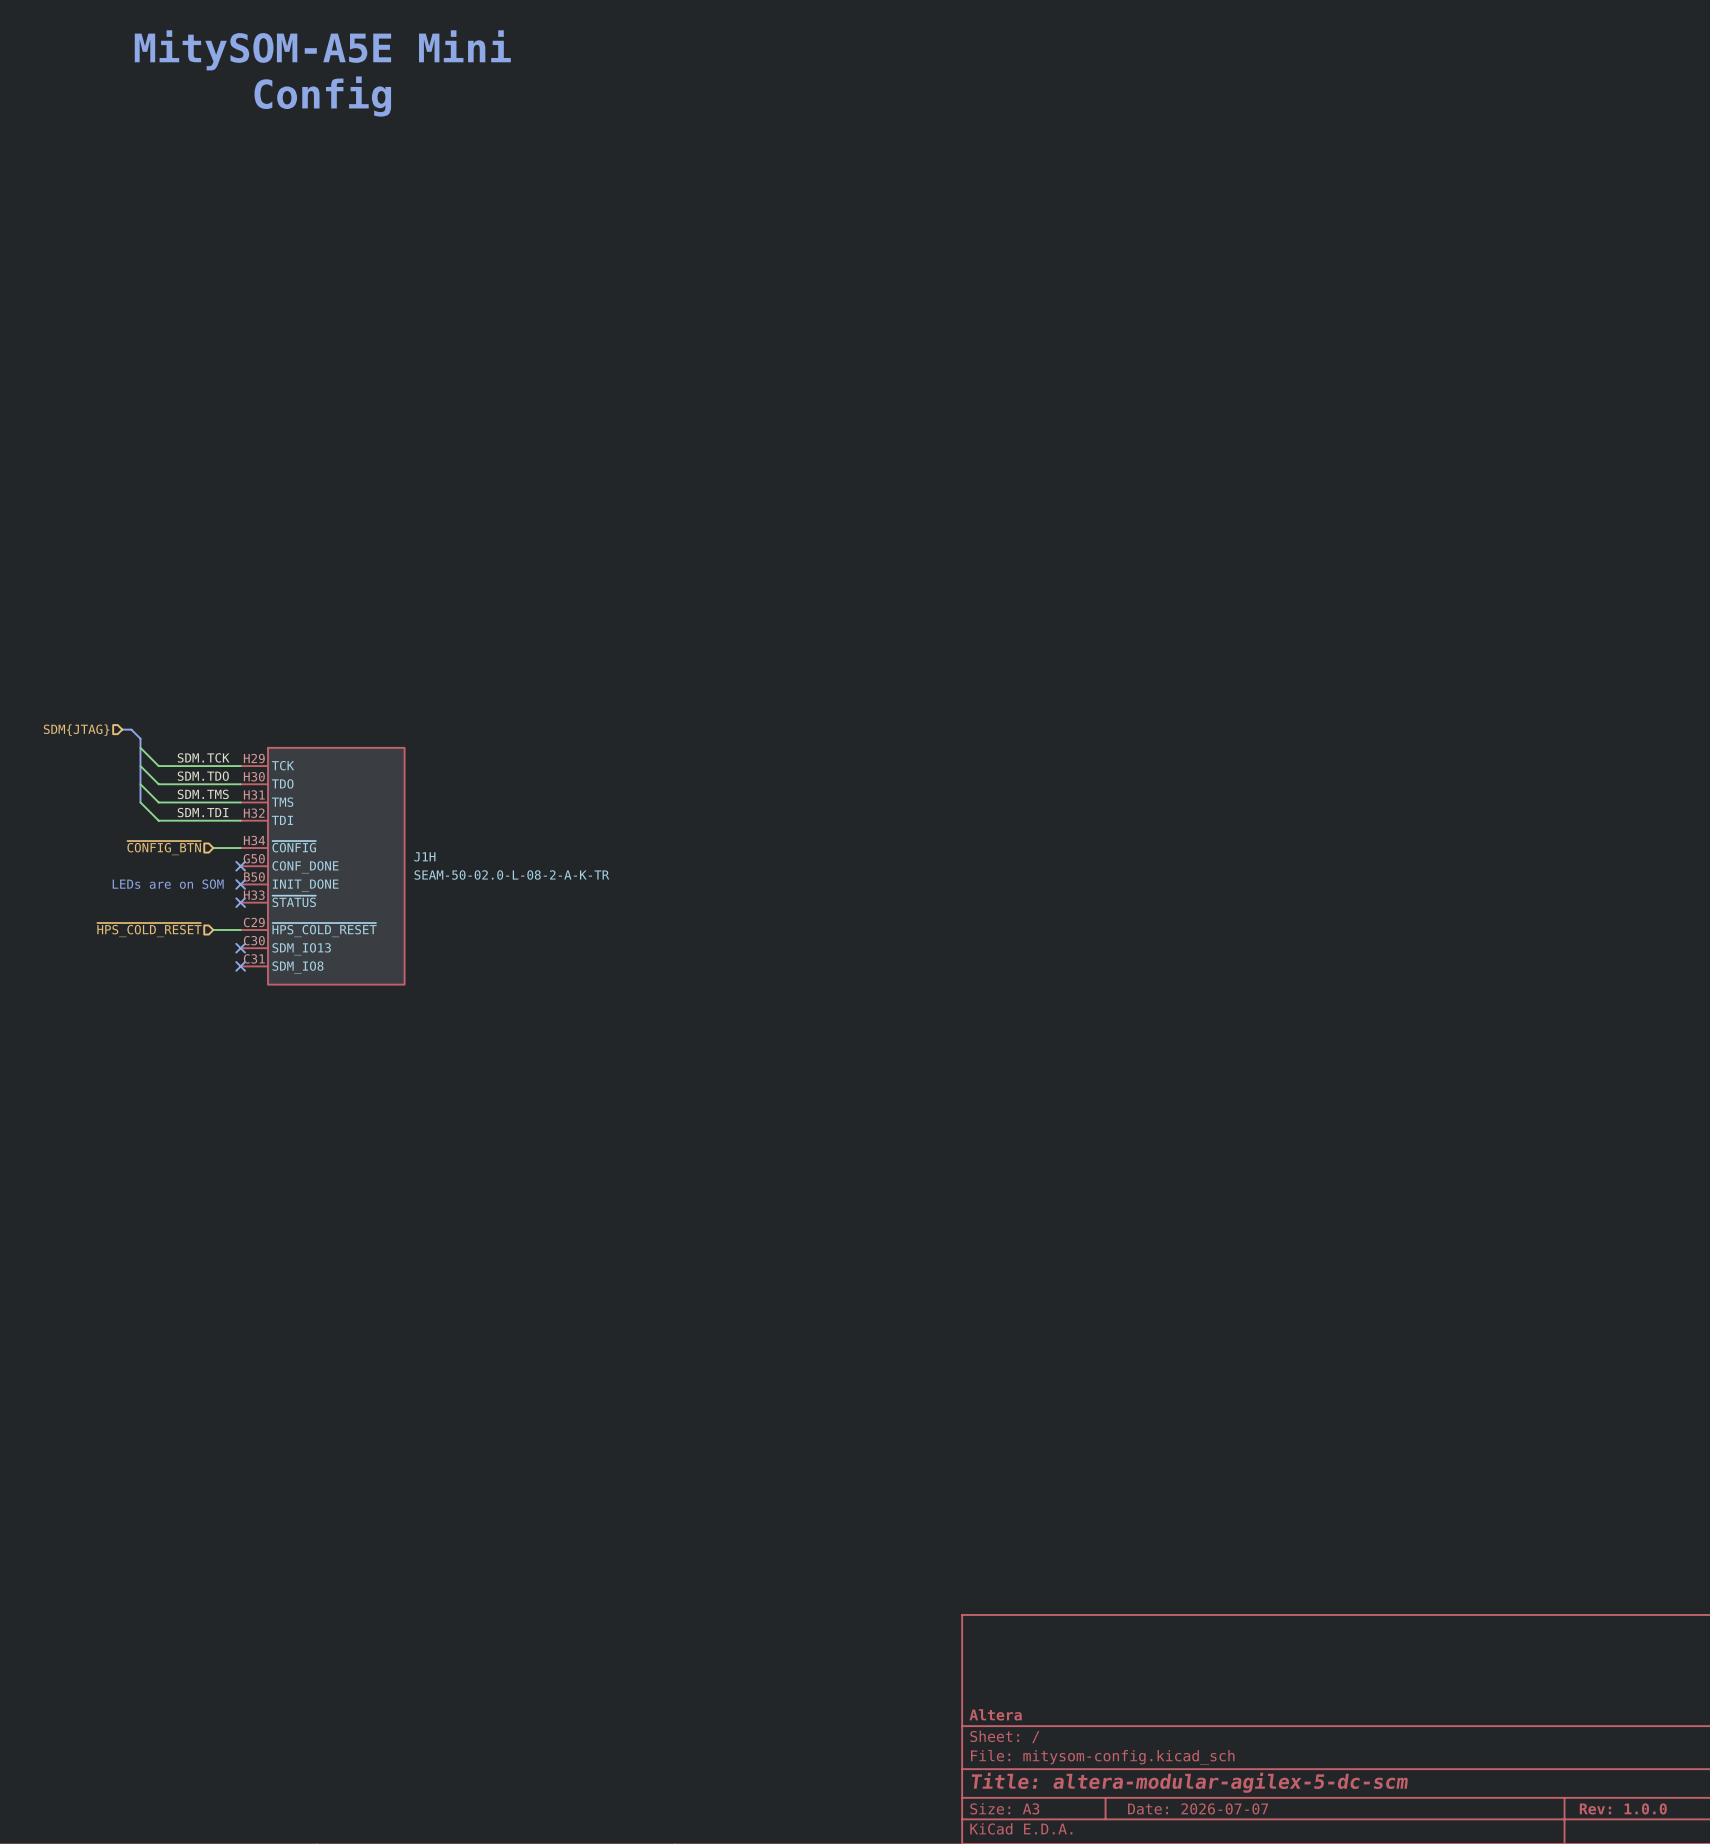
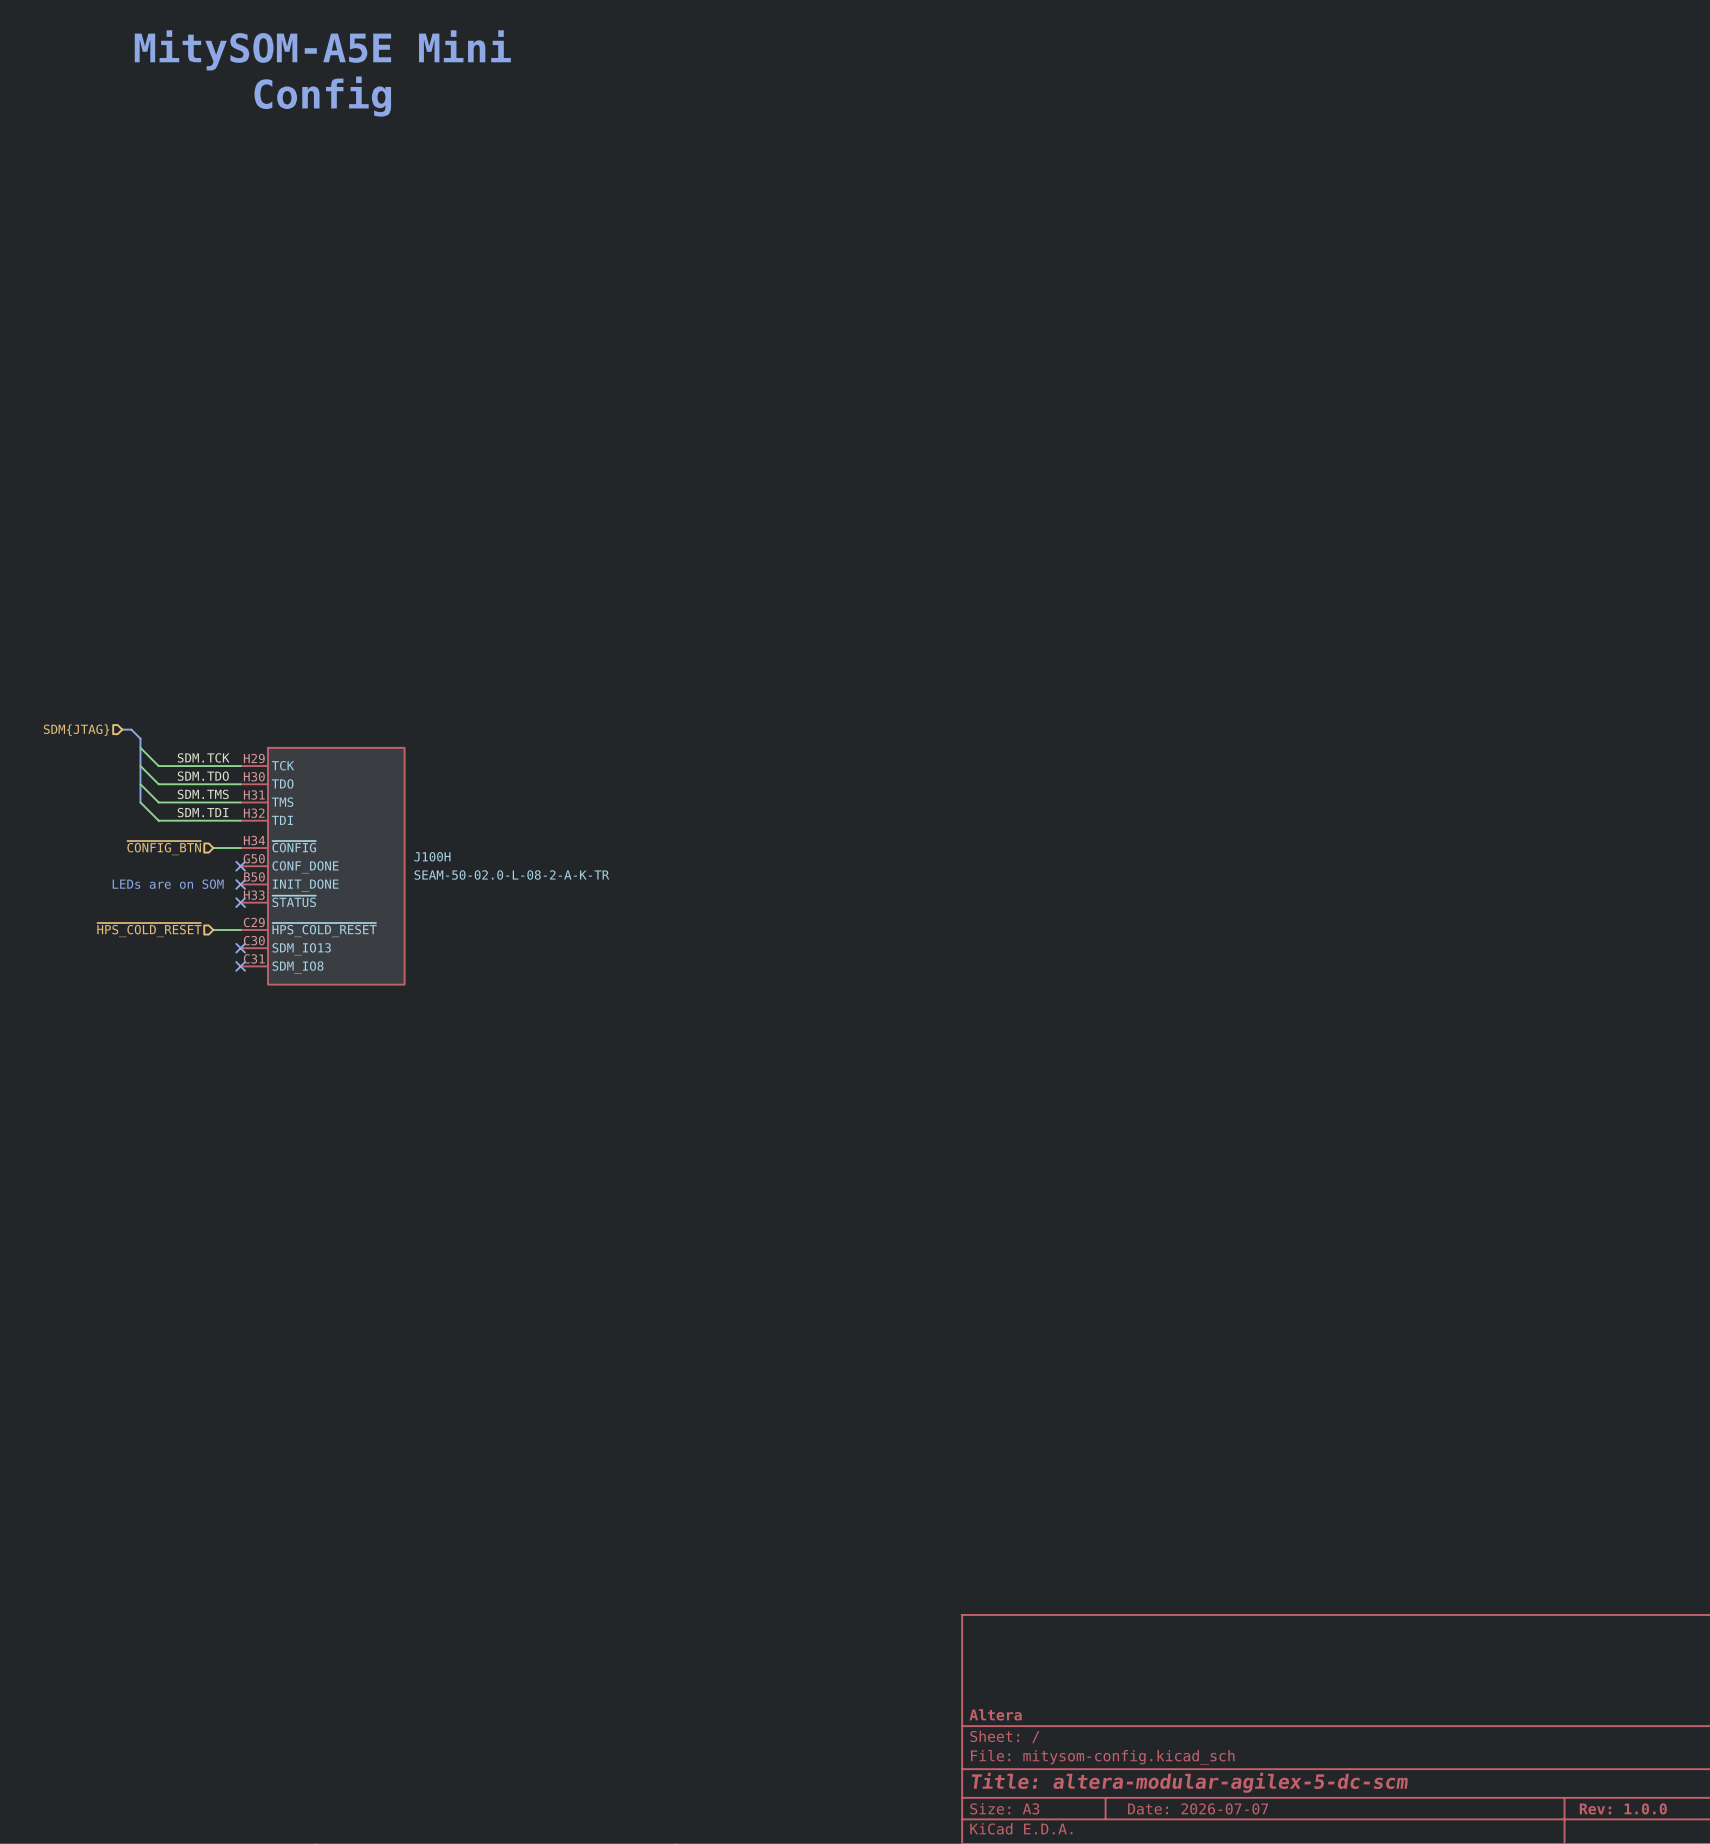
J1H name: J1H (424, 856) -> J100H (432, 856)

